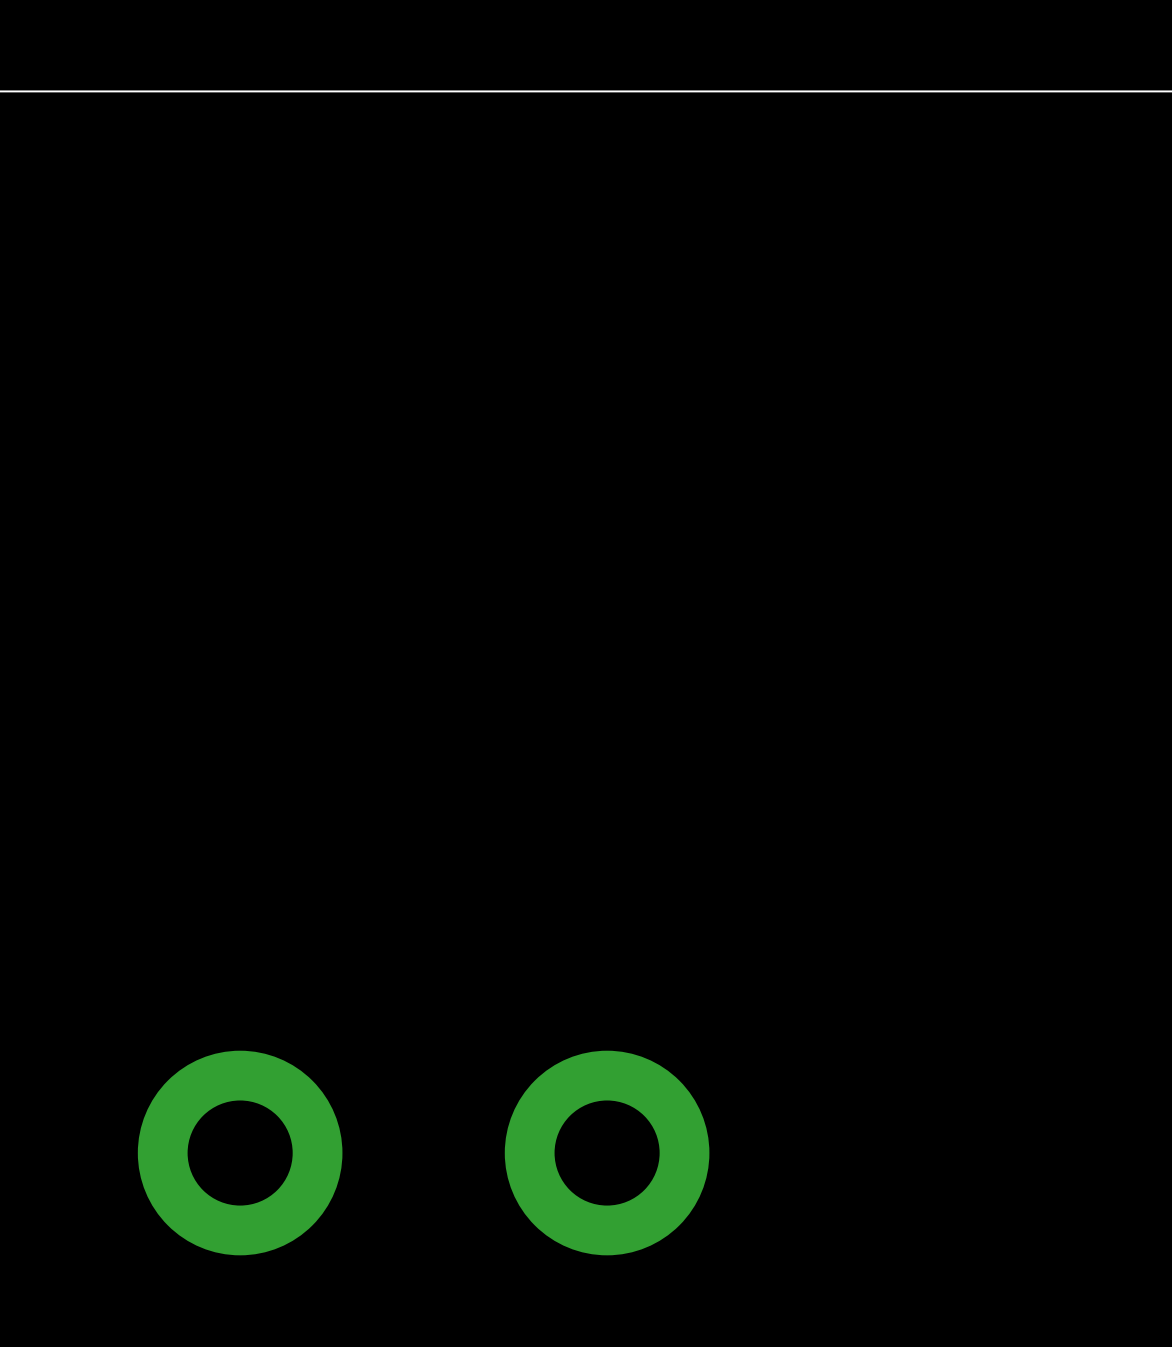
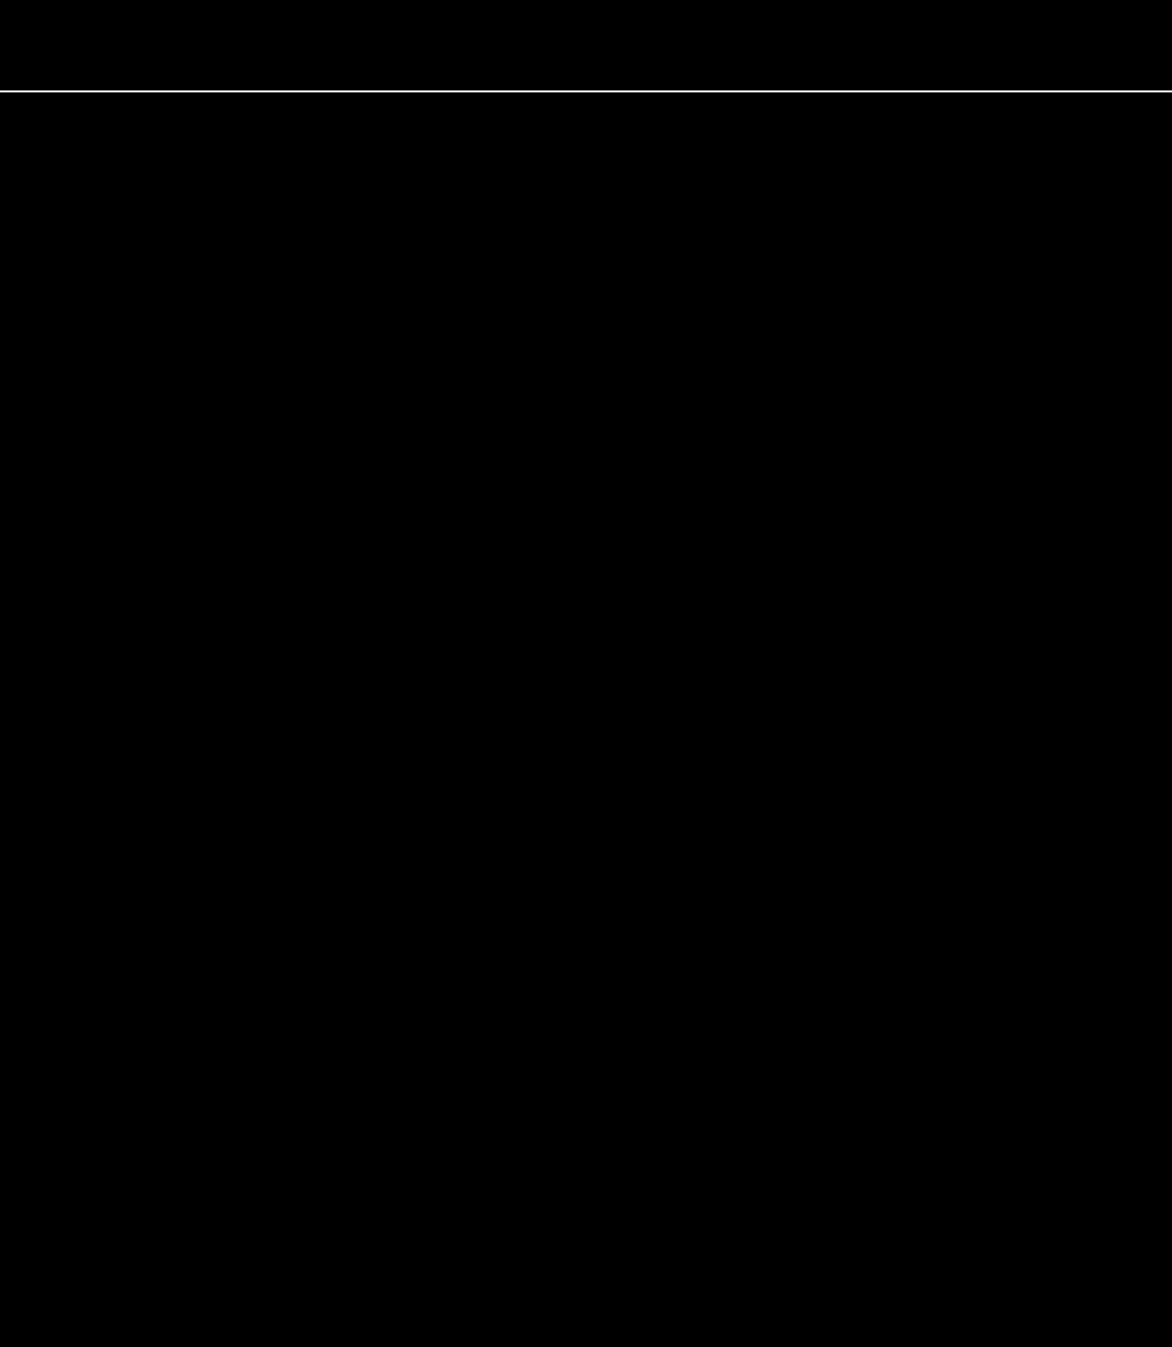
part: (240, 1153) -> none
part: (607, 1153) -> none

